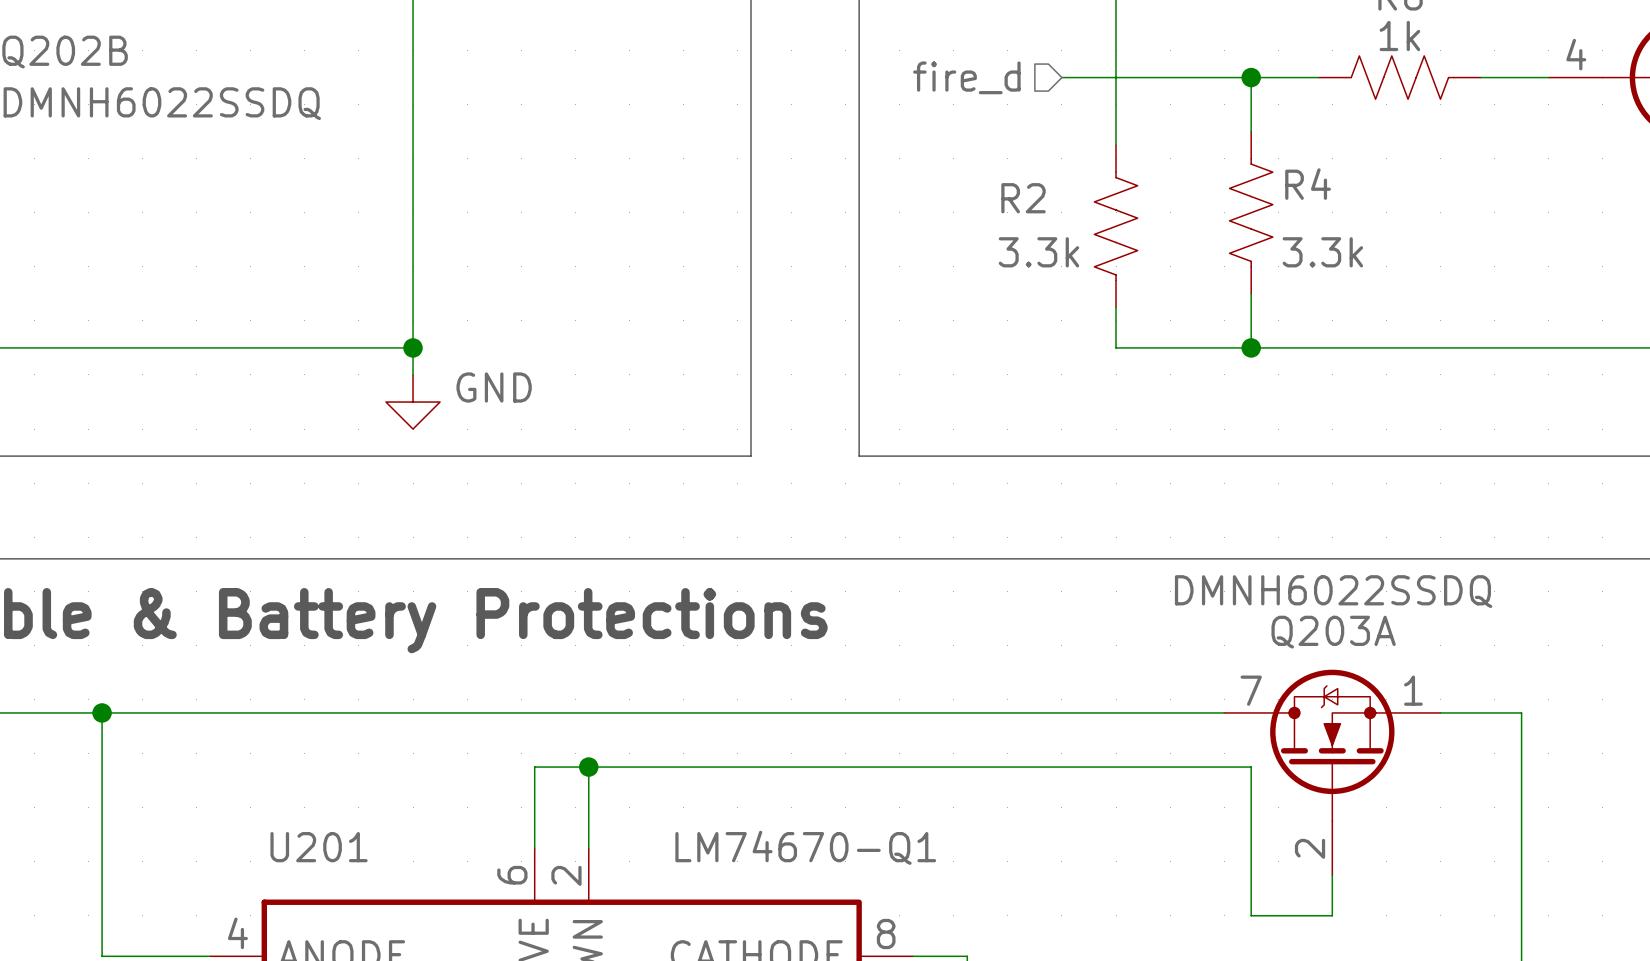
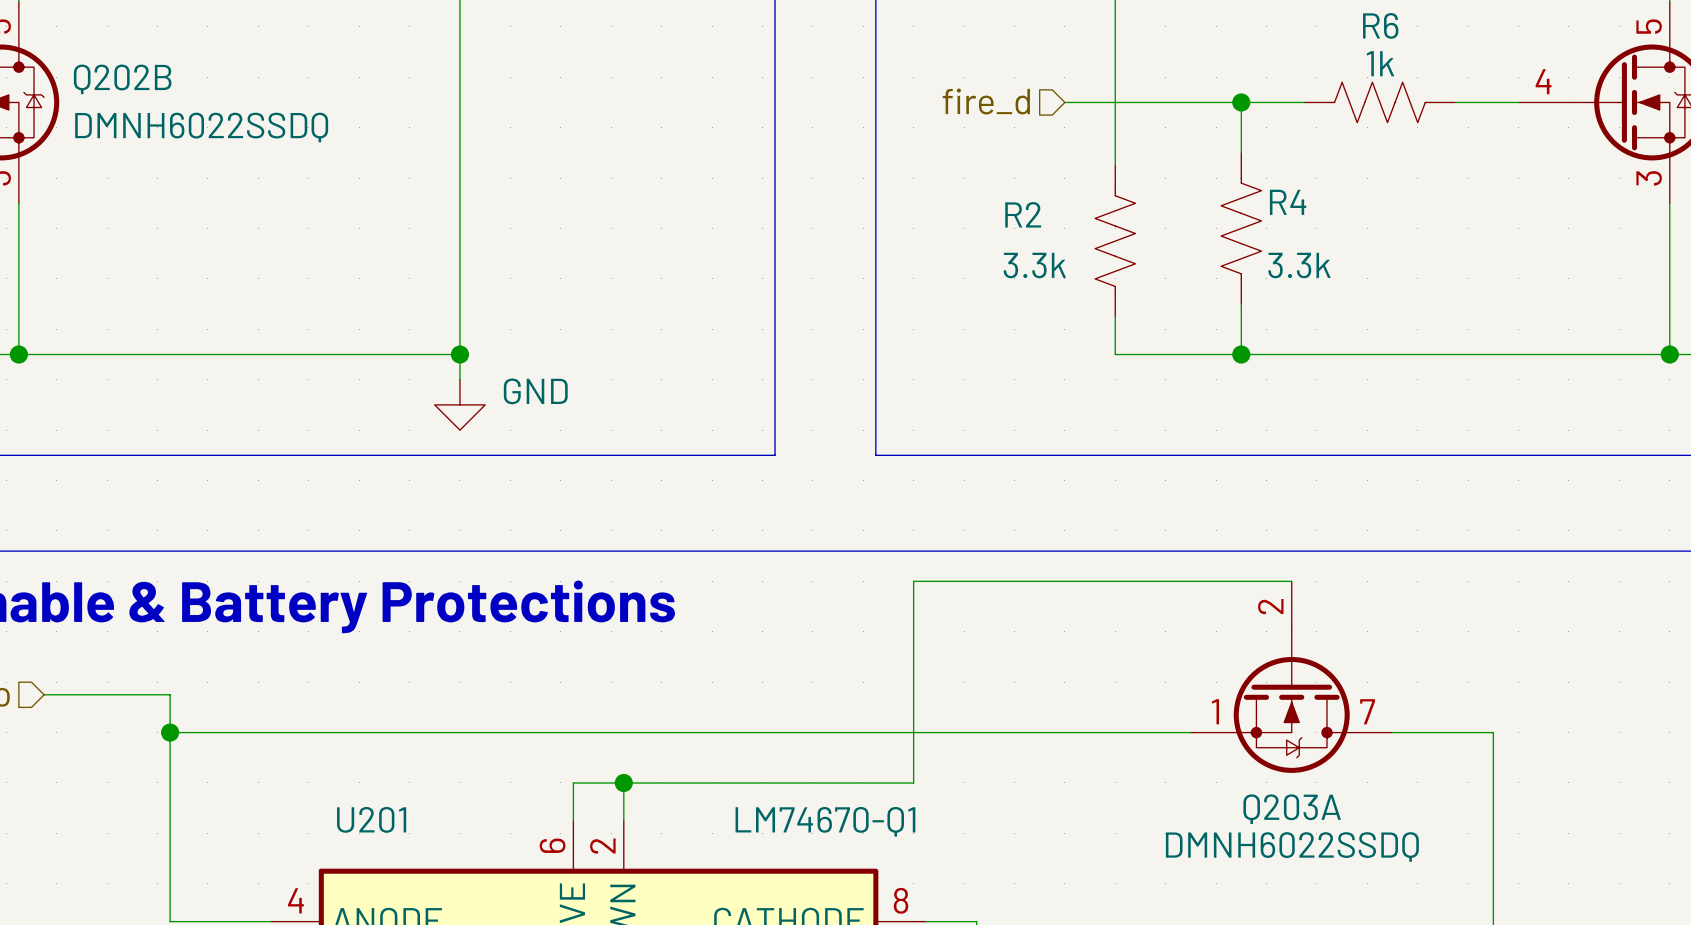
wire: (102, 712) (1224, 712) -> none
junction position: (102, 712) -> (170, 732)
wire: (1440, 712) (1521, 712) (1521, 753) -> (1392, 732) (1493, 732)
Q203A rotation: 0° (1332, 745) -> 180° (1291, 702)
wire: none -> (170, 732) (1190, 732)
wire: (588, 767) (588, 807) -> none
junction position: (588, 767) -> (623, 782)
wire: (534, 807) (534, 767) (1251, 767) (1251, 915) (1332, 915) (1332, 875) -> (573, 782) (913, 782) (913, 581) (1291, 581)

